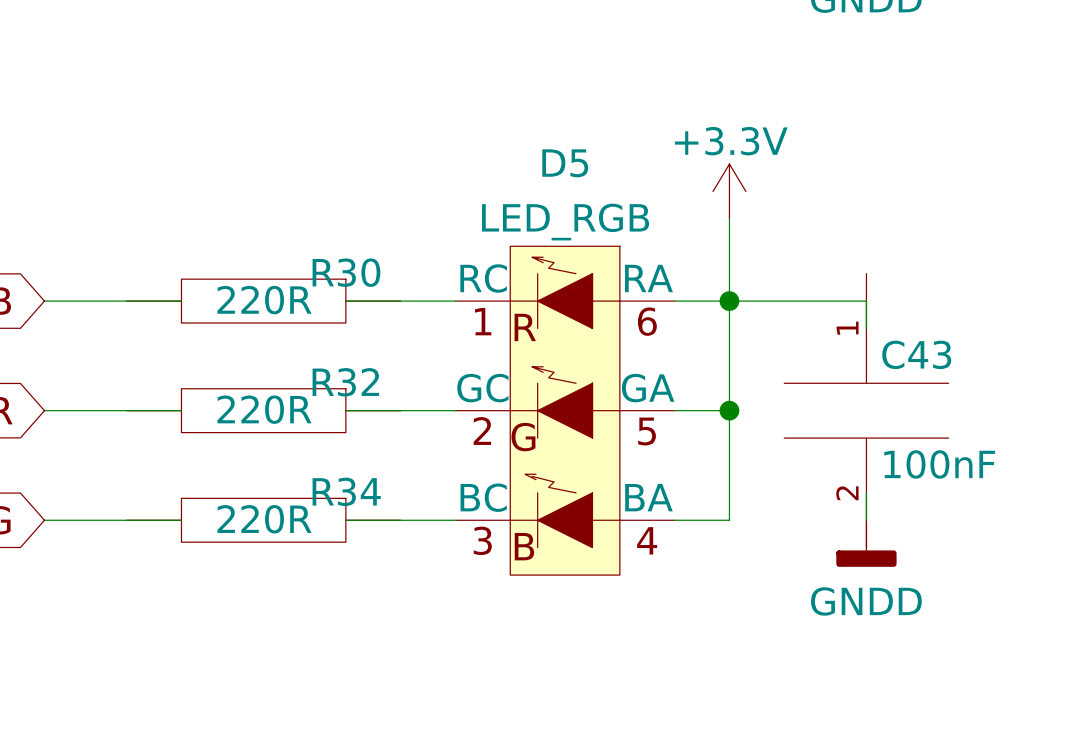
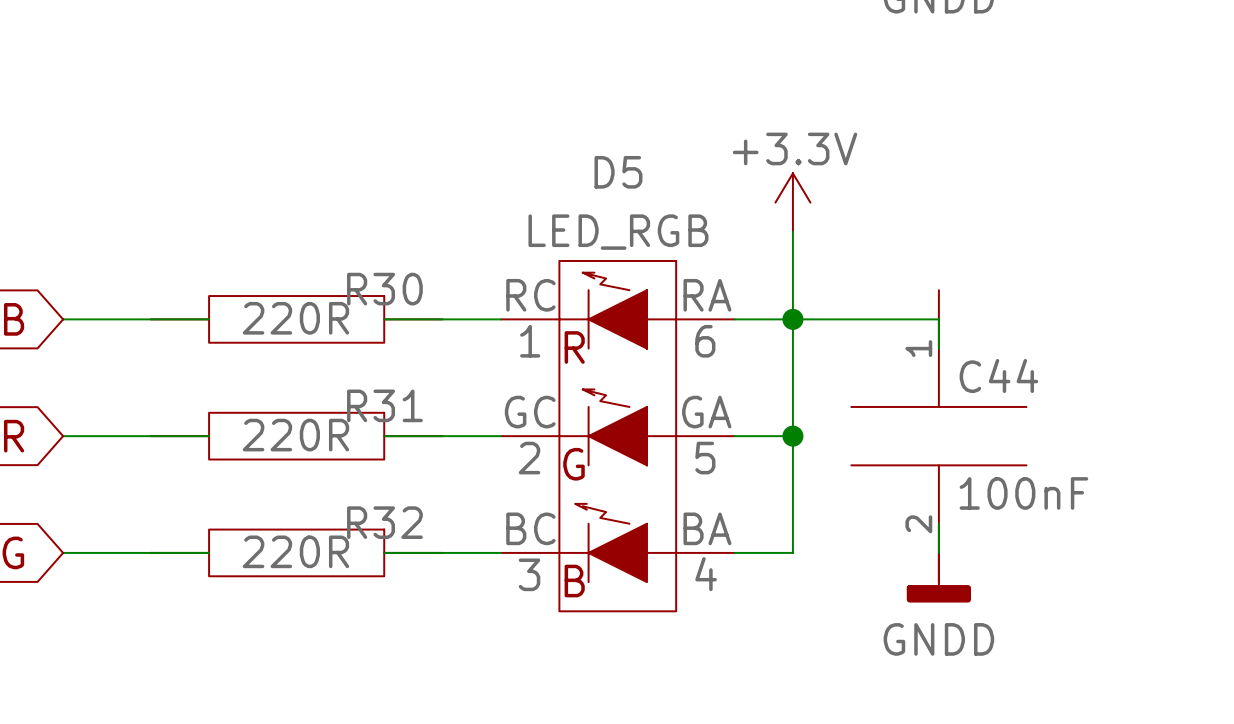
C43 name: C43 (916, 354) -> C44 (998, 375)
R32 name: R32 (345, 382) -> R31 (384, 405)
R34 name: R34 (346, 491) -> R32 (384, 522)

